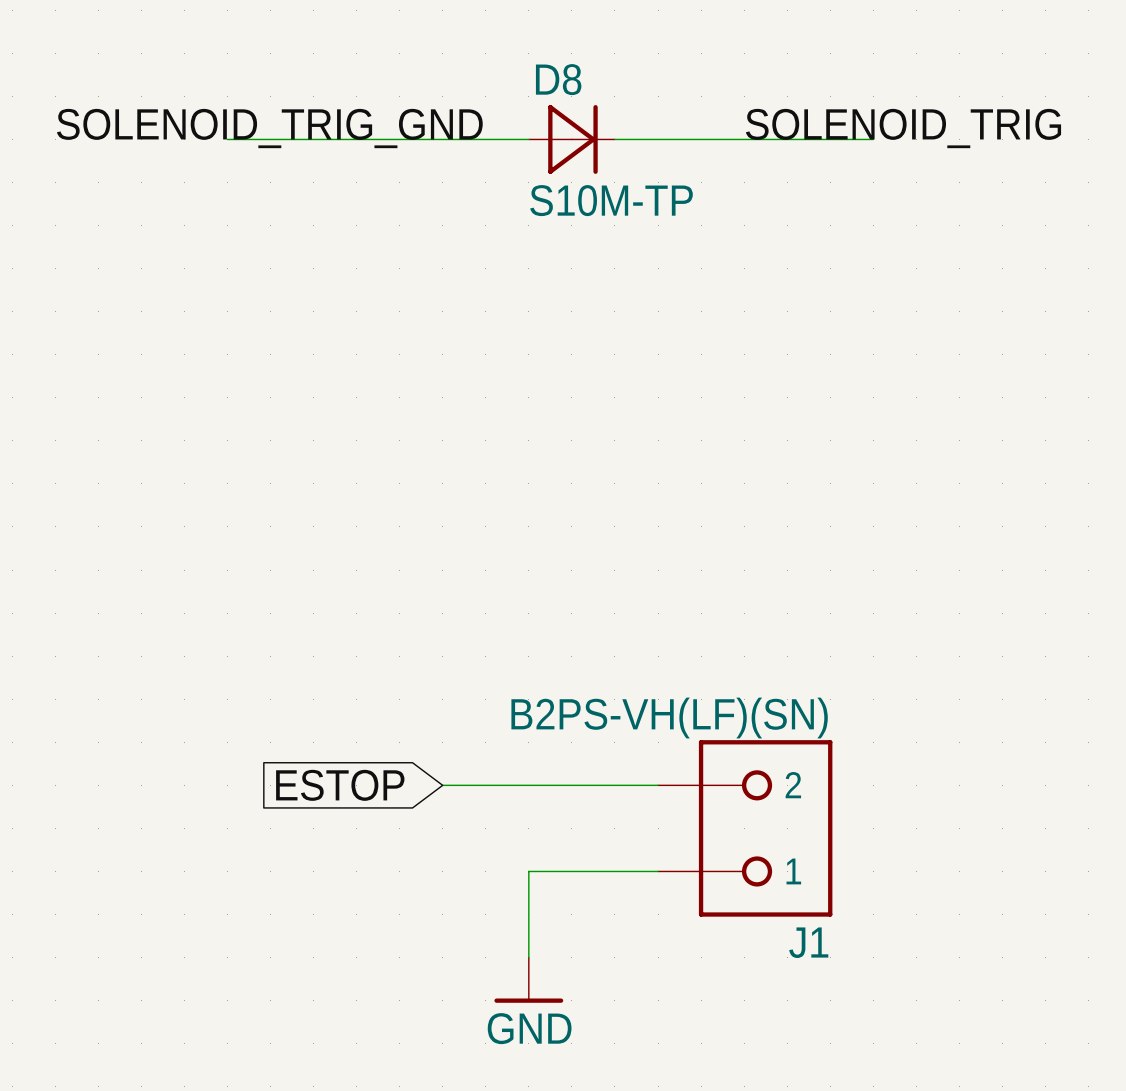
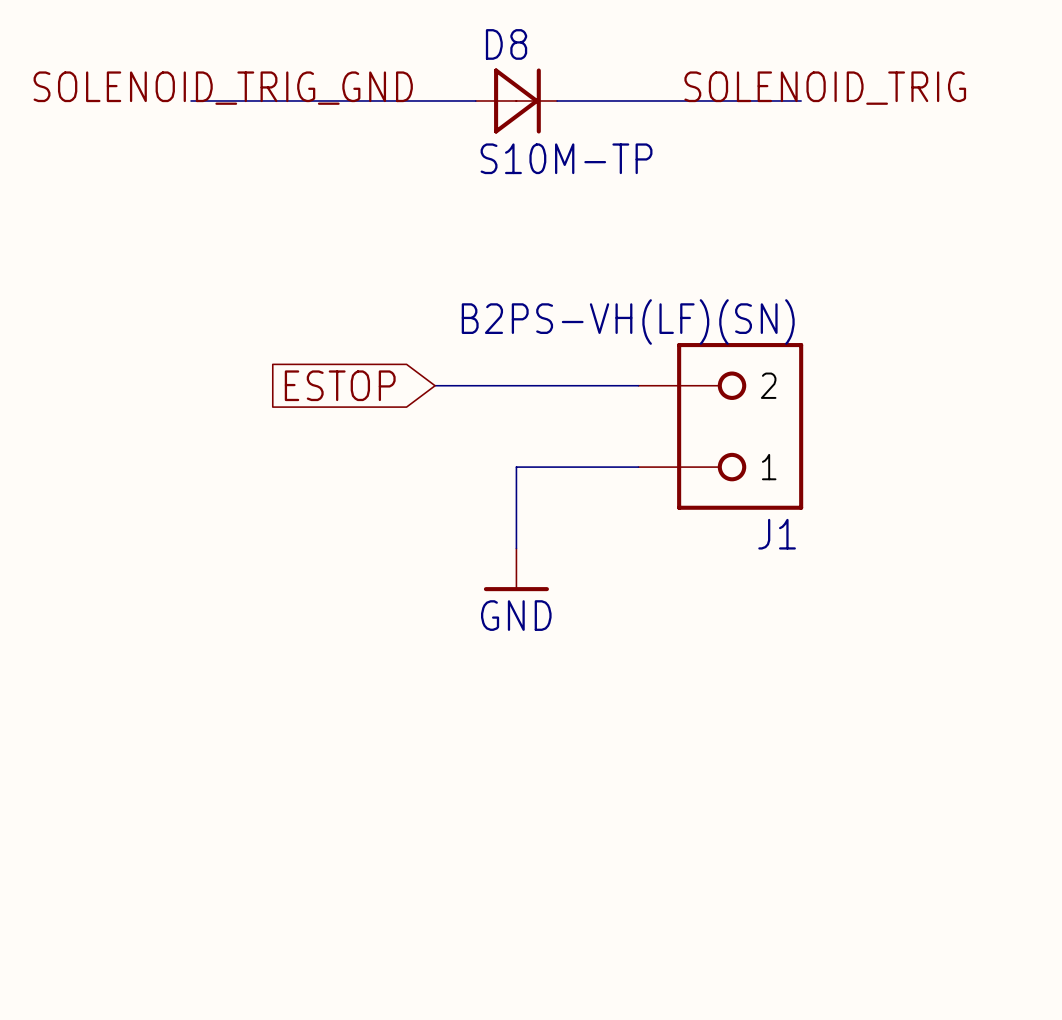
global label position: ESTOP (340, 785) -> ESTOP (340, 385)
wire: (442, 785) (658, 785) -> (435, 385) (638, 385)
J1 position: (745, 828) -> (720, 426)
wire: (658, 871) (528, 871) (528, 957) -> (638, 467) (516, 467) (516, 548)
power symbol position: GND (528, 980) -> GND (516, 569)

